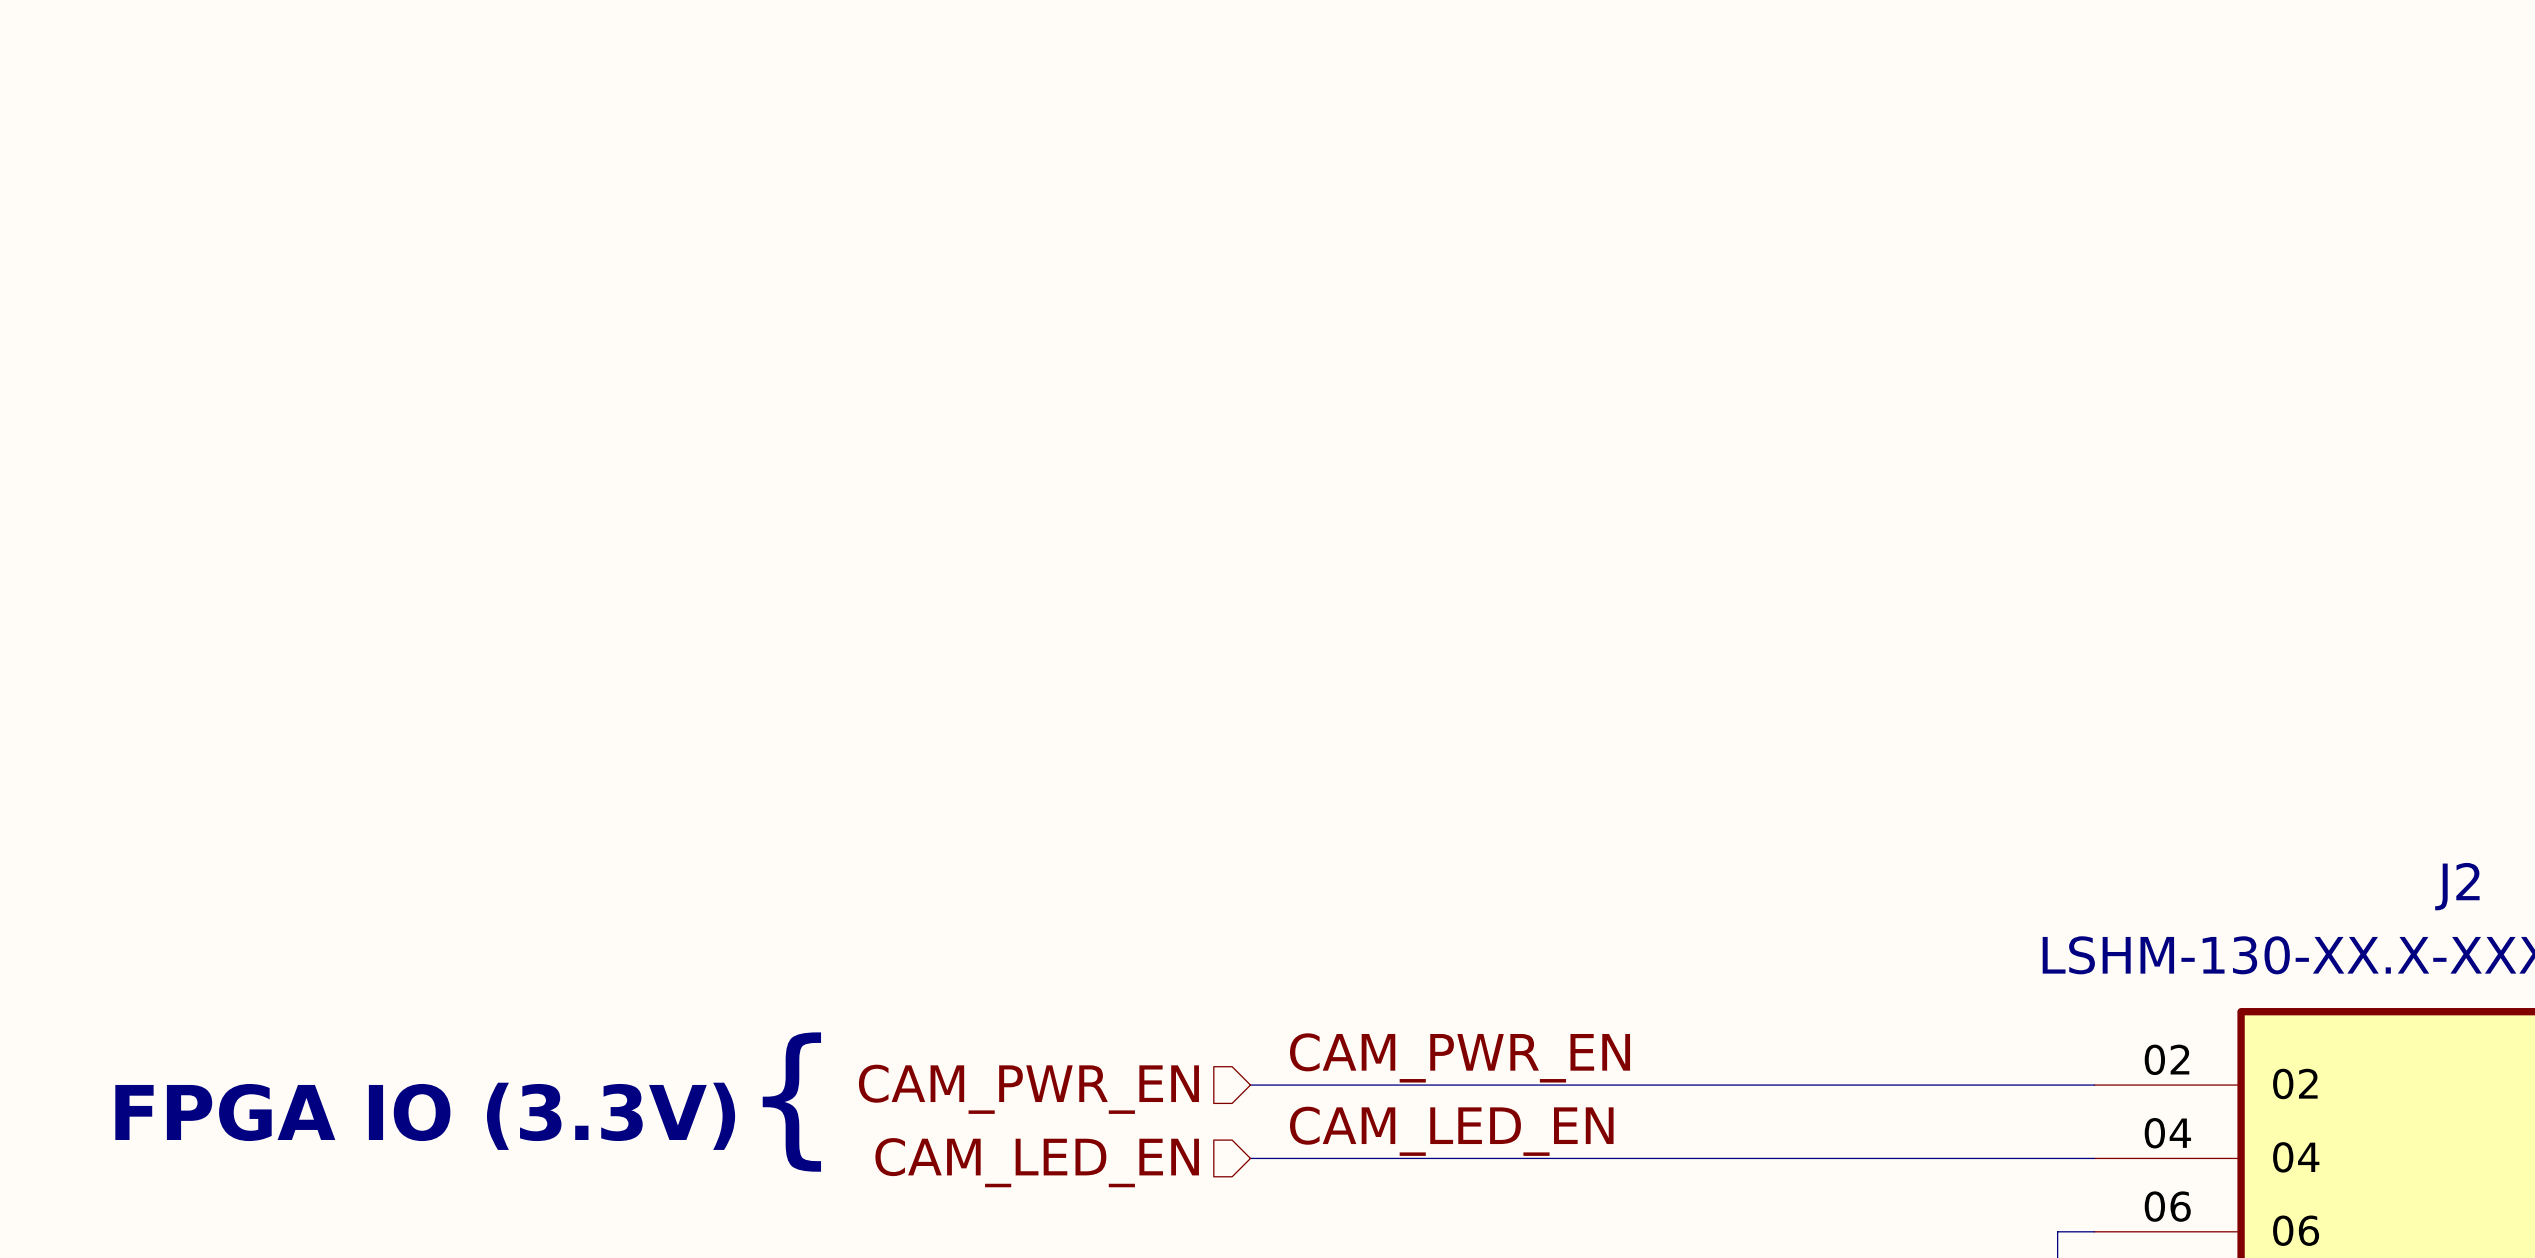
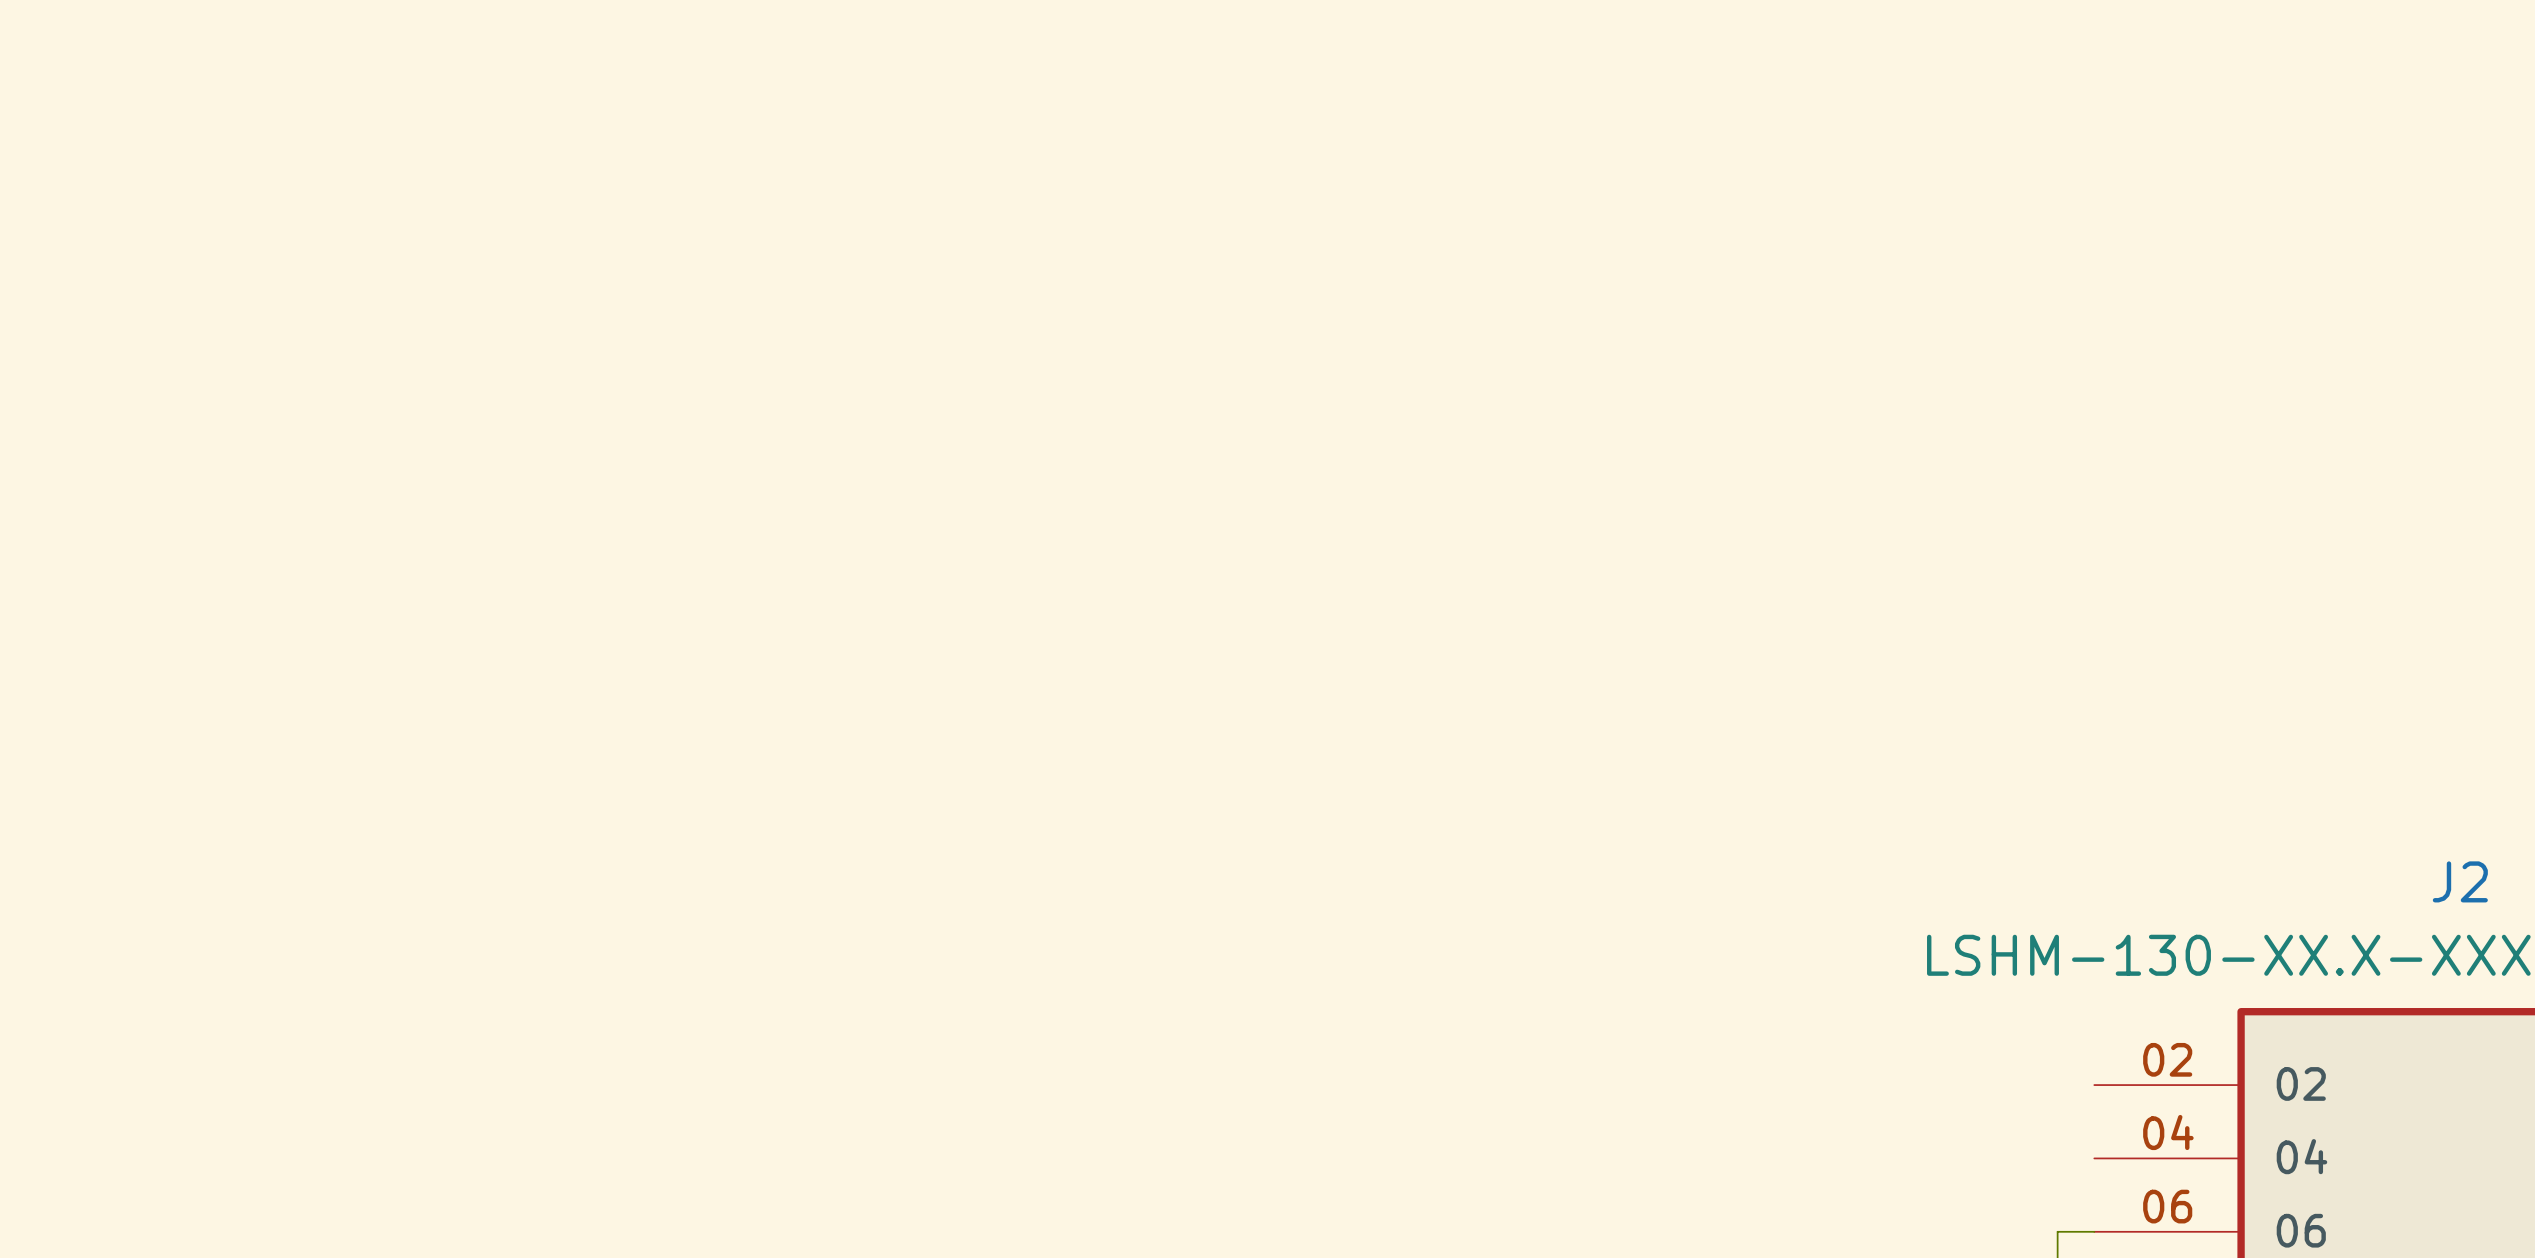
label: CAM_PWR_EN (1460, 1057) -> none
wire: (1250, 1085) (2094, 1085) -> none
hierarchical label: CAM_PWR_EN (1028, 1089) -> none
text: { (791, 1102) -> none
text: FPGA IO (3.3V) (425, 1116) -> none
label: CAM_LED_EN (1451, 1131) -> none
wire: (1250, 1158) (2094, 1158) -> none
hierarchical label: CAM_LED_EN (1037, 1162) -> none

